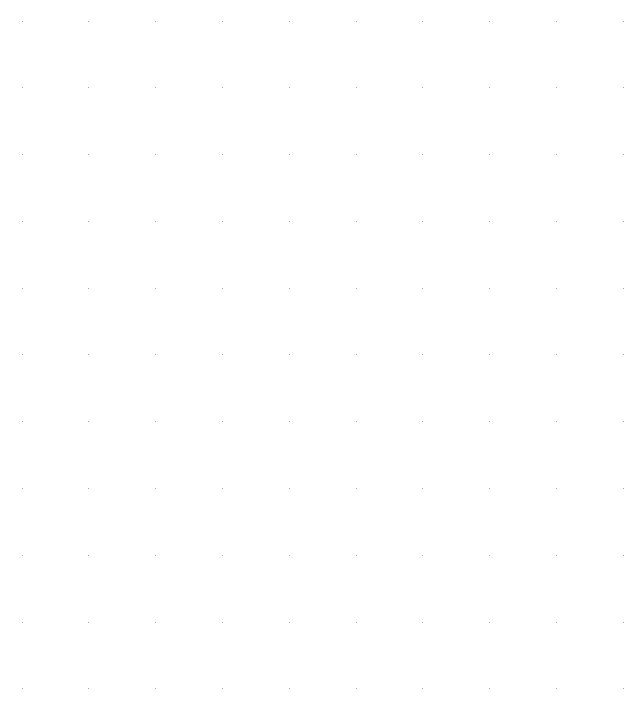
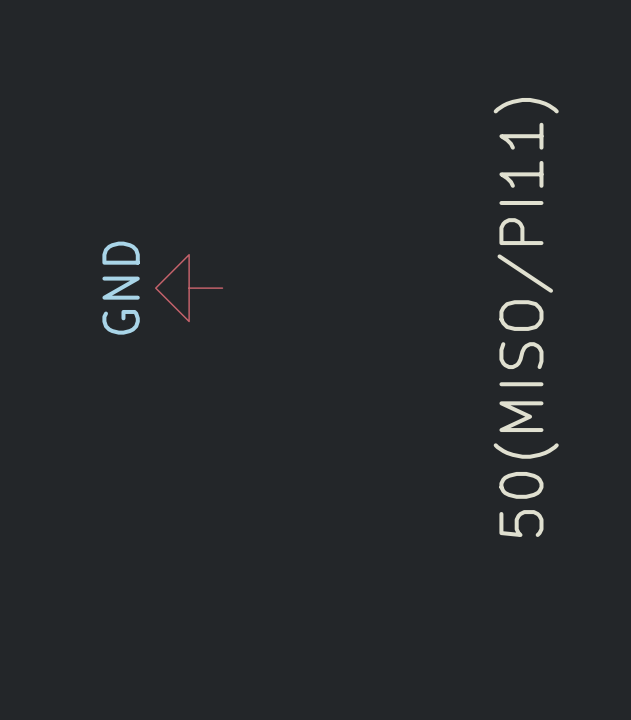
label: none -> 50(MISO/PI11) (526, 317)
power symbol: none -> GND (189, 288)

